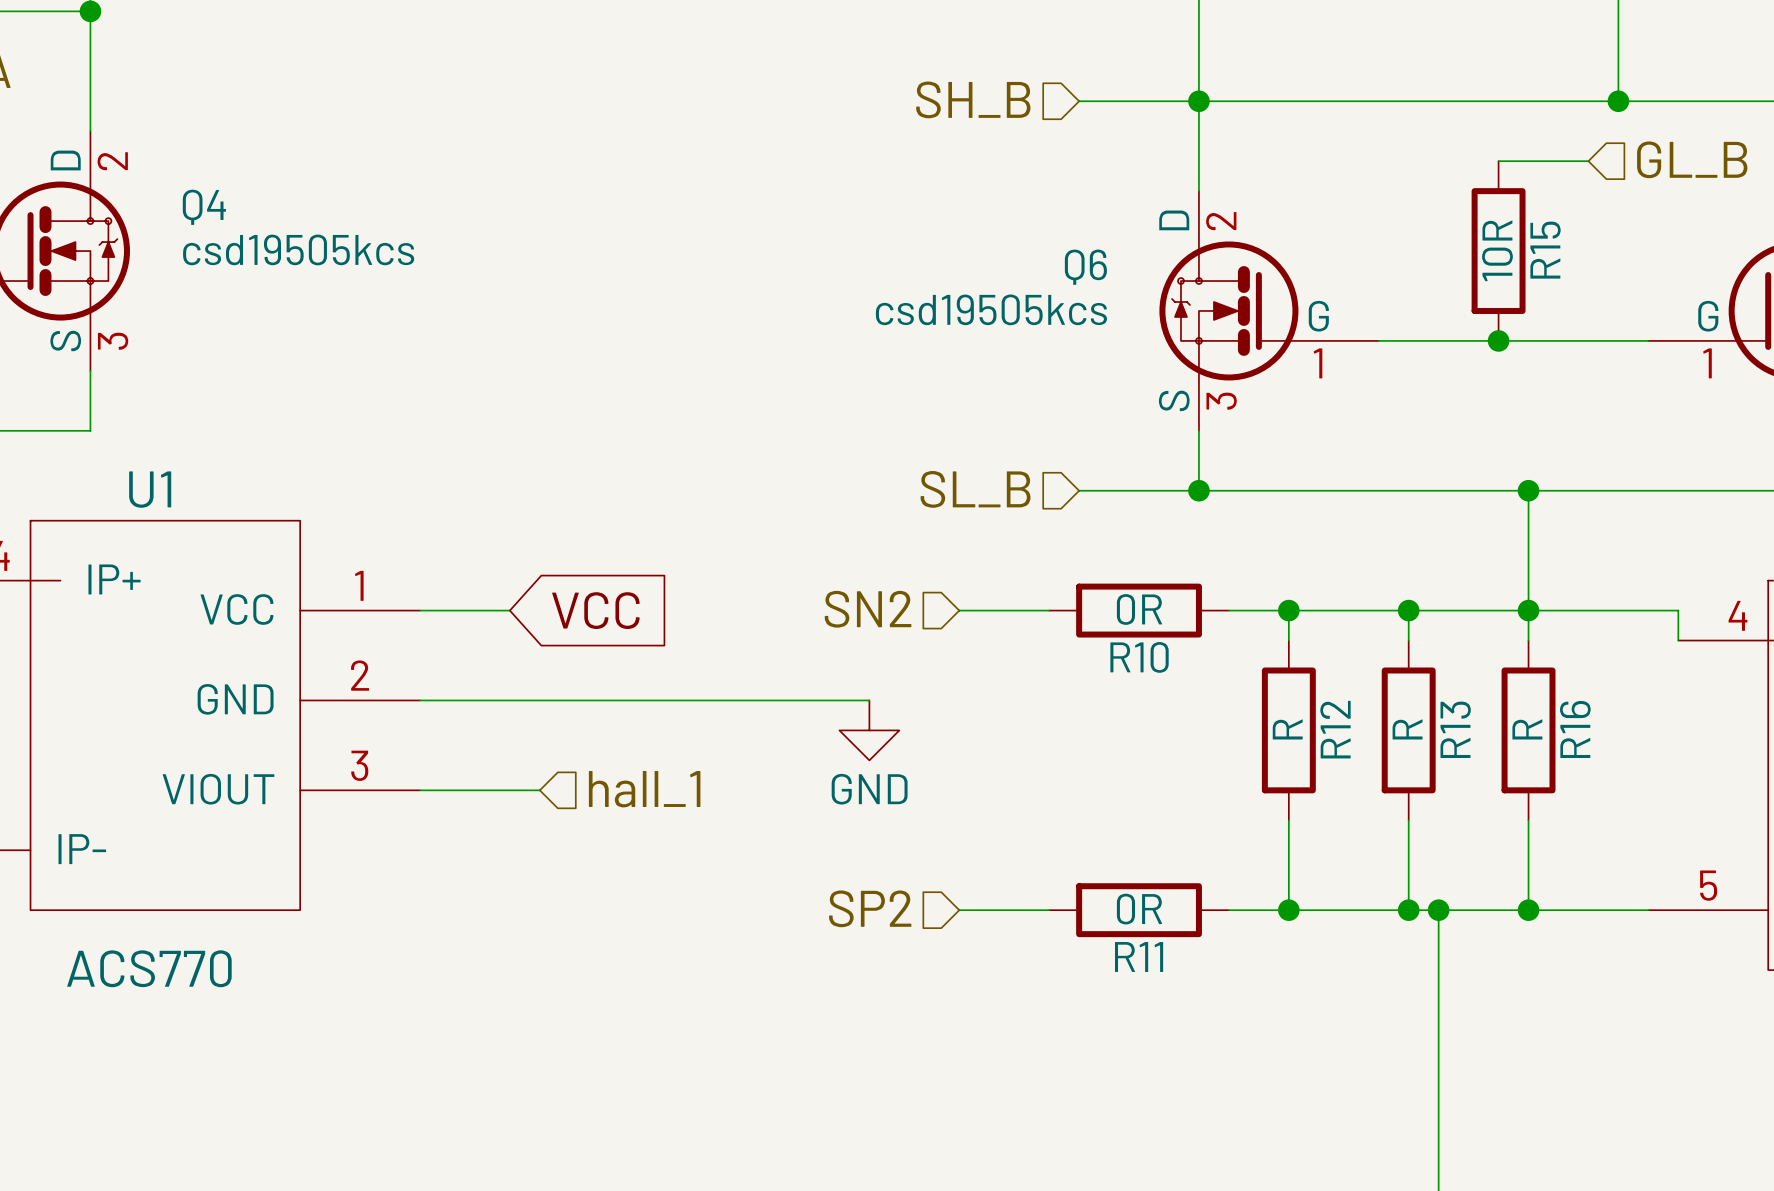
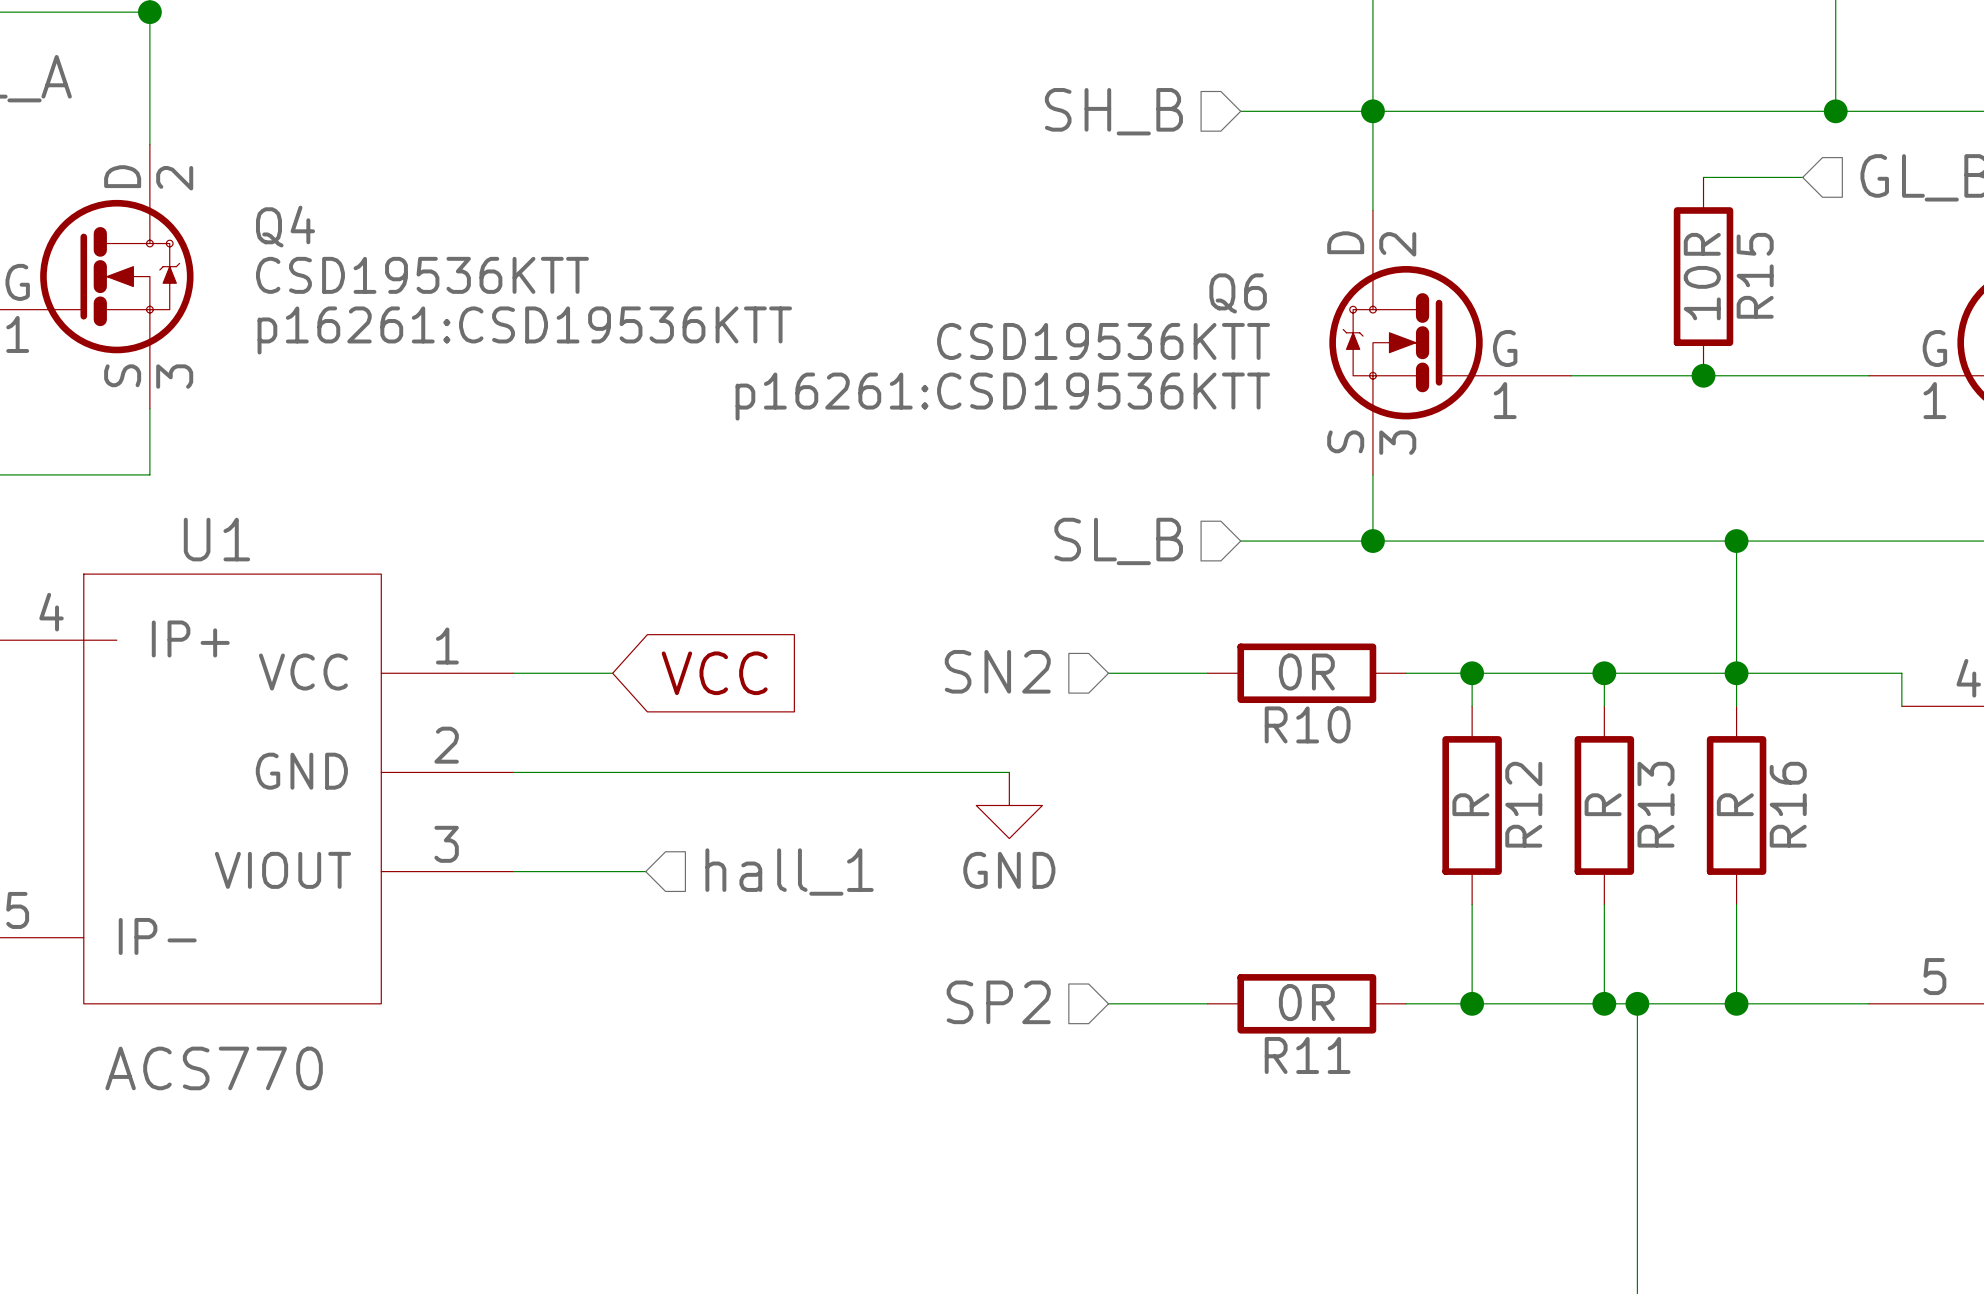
Q4 value: csd19505kcs (298, 249) -> CSD19536KTT (422, 275)
Q4 text: none -> p16261:CSD19536KTT (524, 330)
Q6 value: csd19505kcs (991, 309) -> CSD19536KTT (1103, 341)
Q6 text: none -> p16261:CSD19536KTT (1002, 396)

